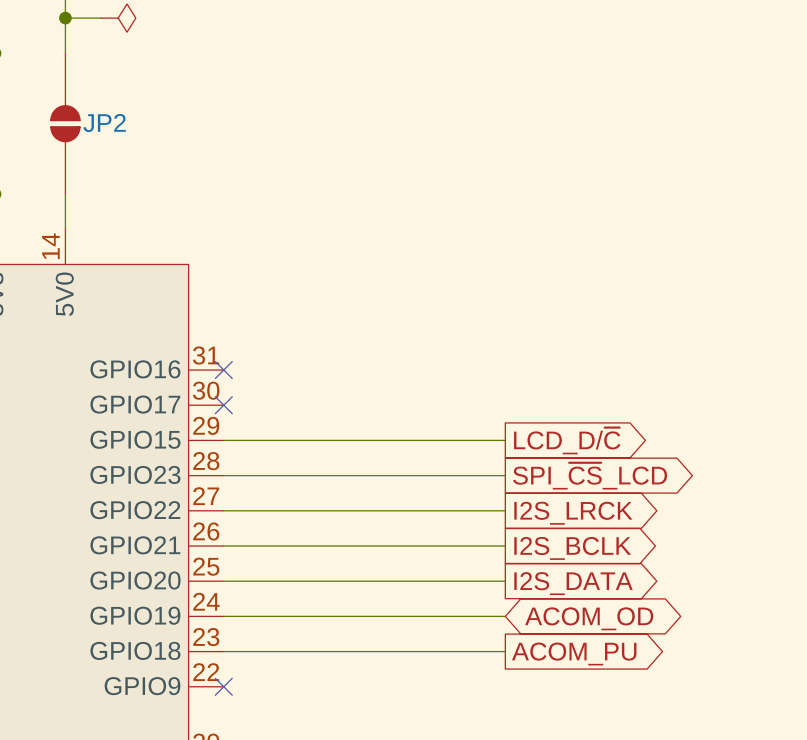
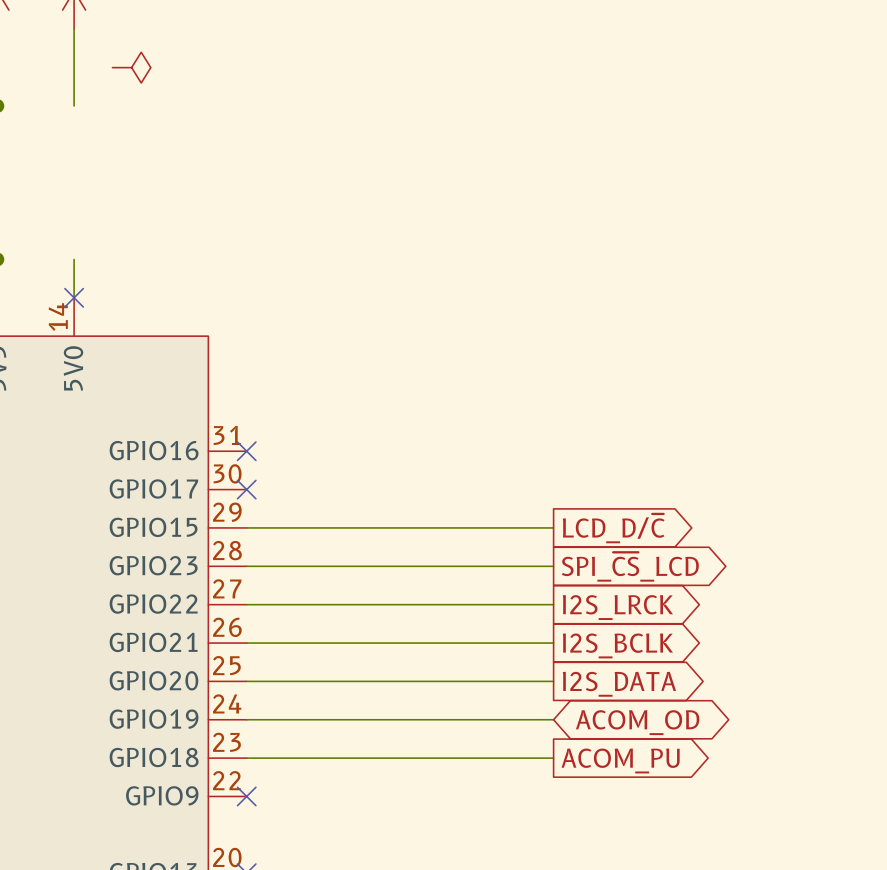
wire: (65, 18) (100, 18) -> none
junction: (65, 18) -> none
JP2: (65, 123) -> none
no-connect mark: none -> (74, 297)

